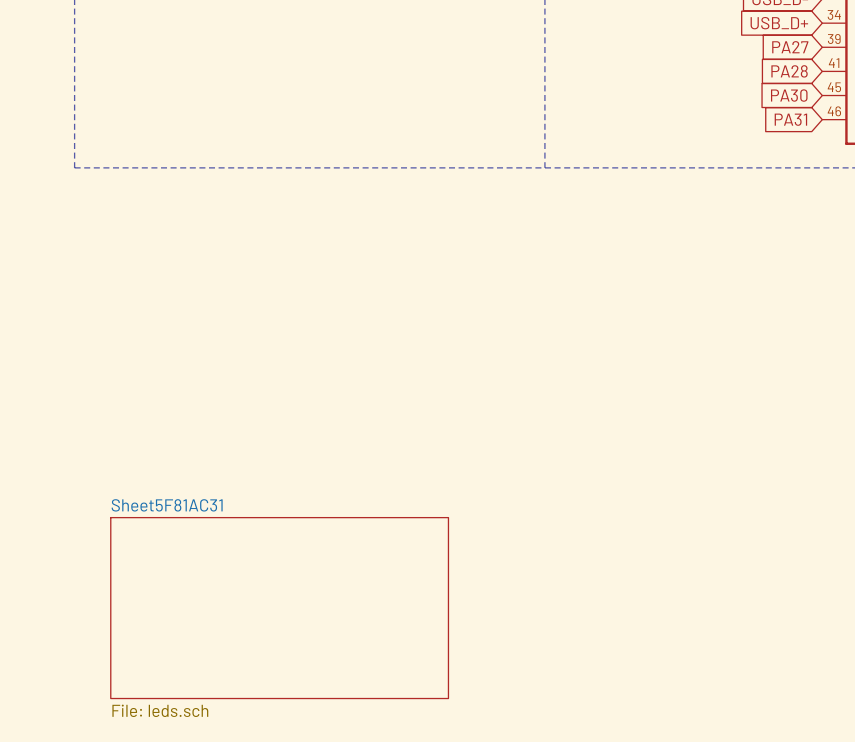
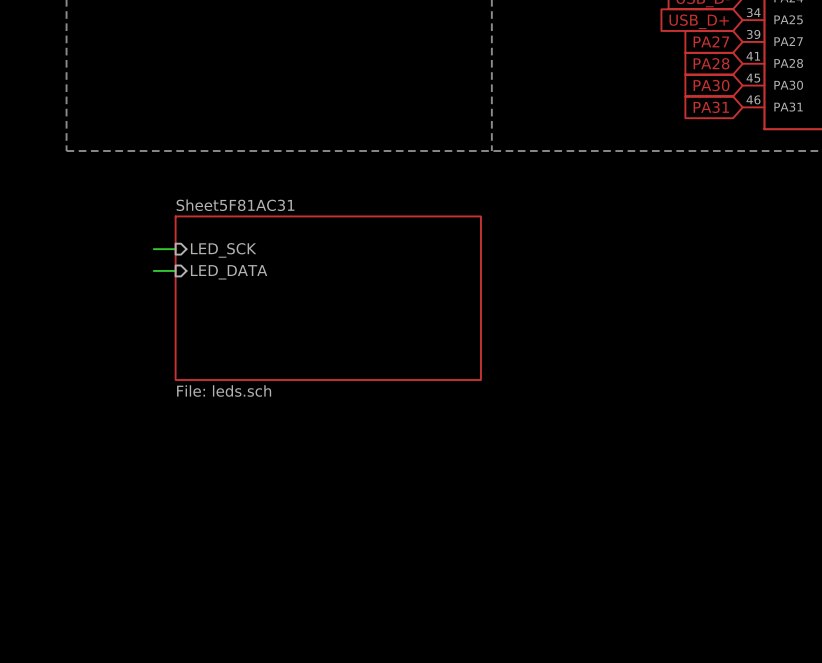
sheet pin: none -> LED_SCK (223, 250)
wire: none -> (153, 249) (175, 249)
wire: none -> (153, 270) (175, 270)
sheet pin: none -> LED_DATA (229, 272)
sheet Sheet5F81AC31 position: (279, 608) -> (328, 298)

